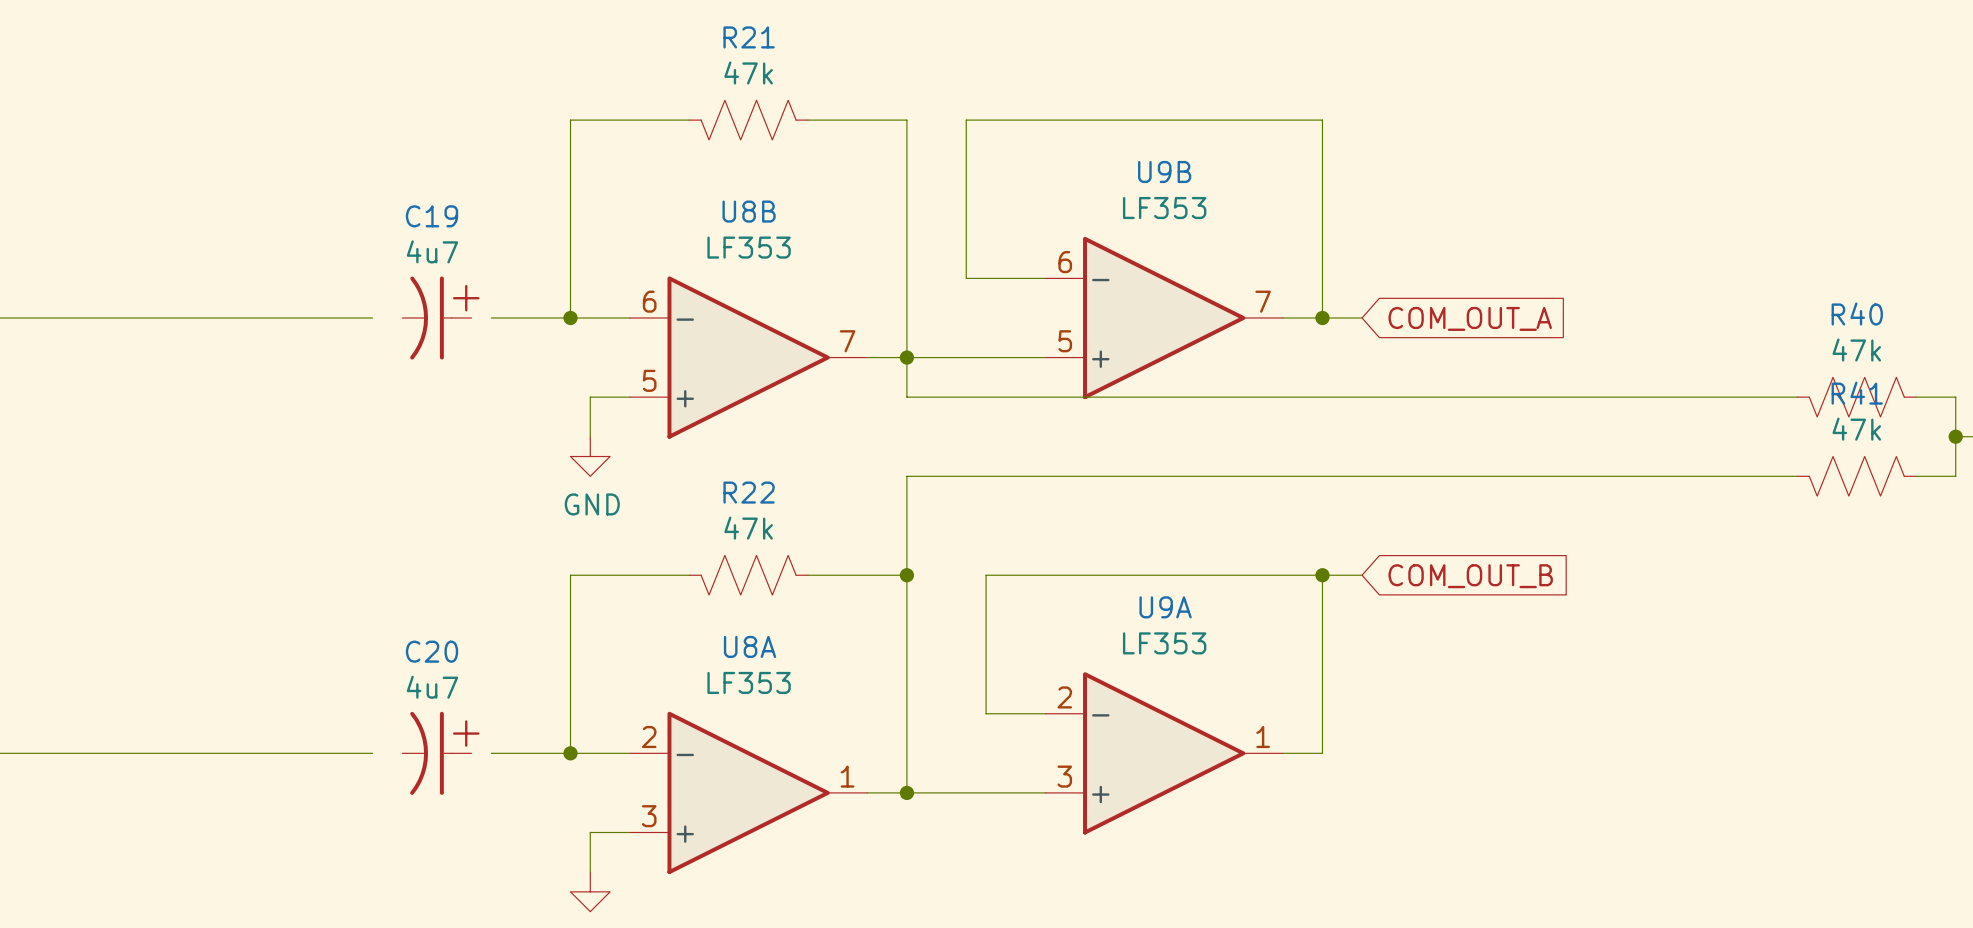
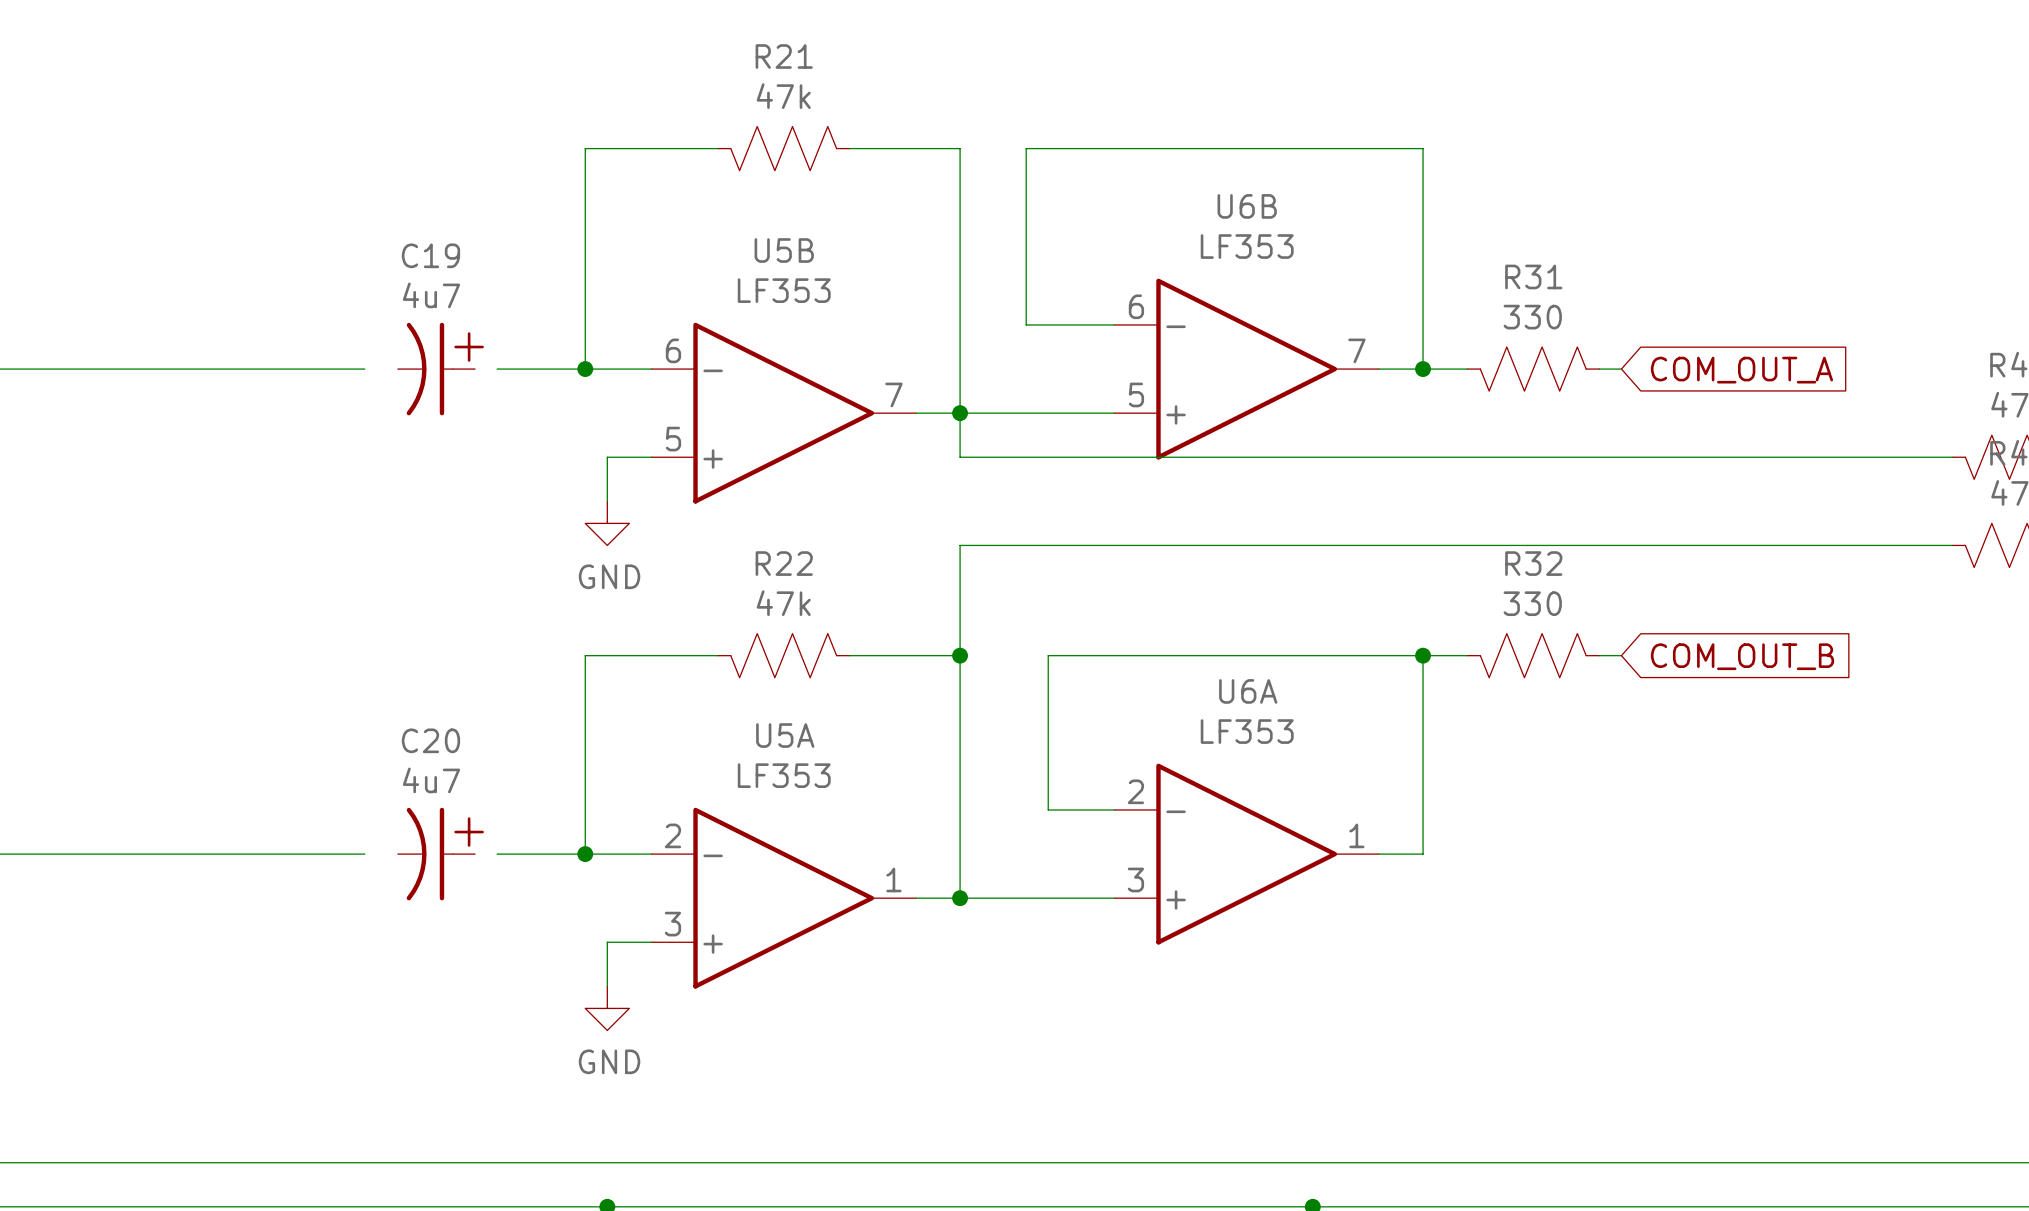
U9B name: U9B (1164, 172) -> U6B (1247, 206)
U8B name: U8B (749, 211) -> U5B (784, 250)
R31: none -> 330 (1533, 369)
wire: none -> (1599, 369) (1621, 369)
global label position: COM_OUT_A (1470, 318) -> COM_OUT_A (1741, 370)
R32: none -> 330 (1533, 655)
wire: none -> (1599, 655) (1621, 655)
global label position: COM_OUT_B (1470, 576) -> COM_OUT_B (1742, 656)
U9A name: U9A (1165, 607) -> U6A (1248, 691)
U8A name: U8A (750, 646) -> U5A (785, 735)

